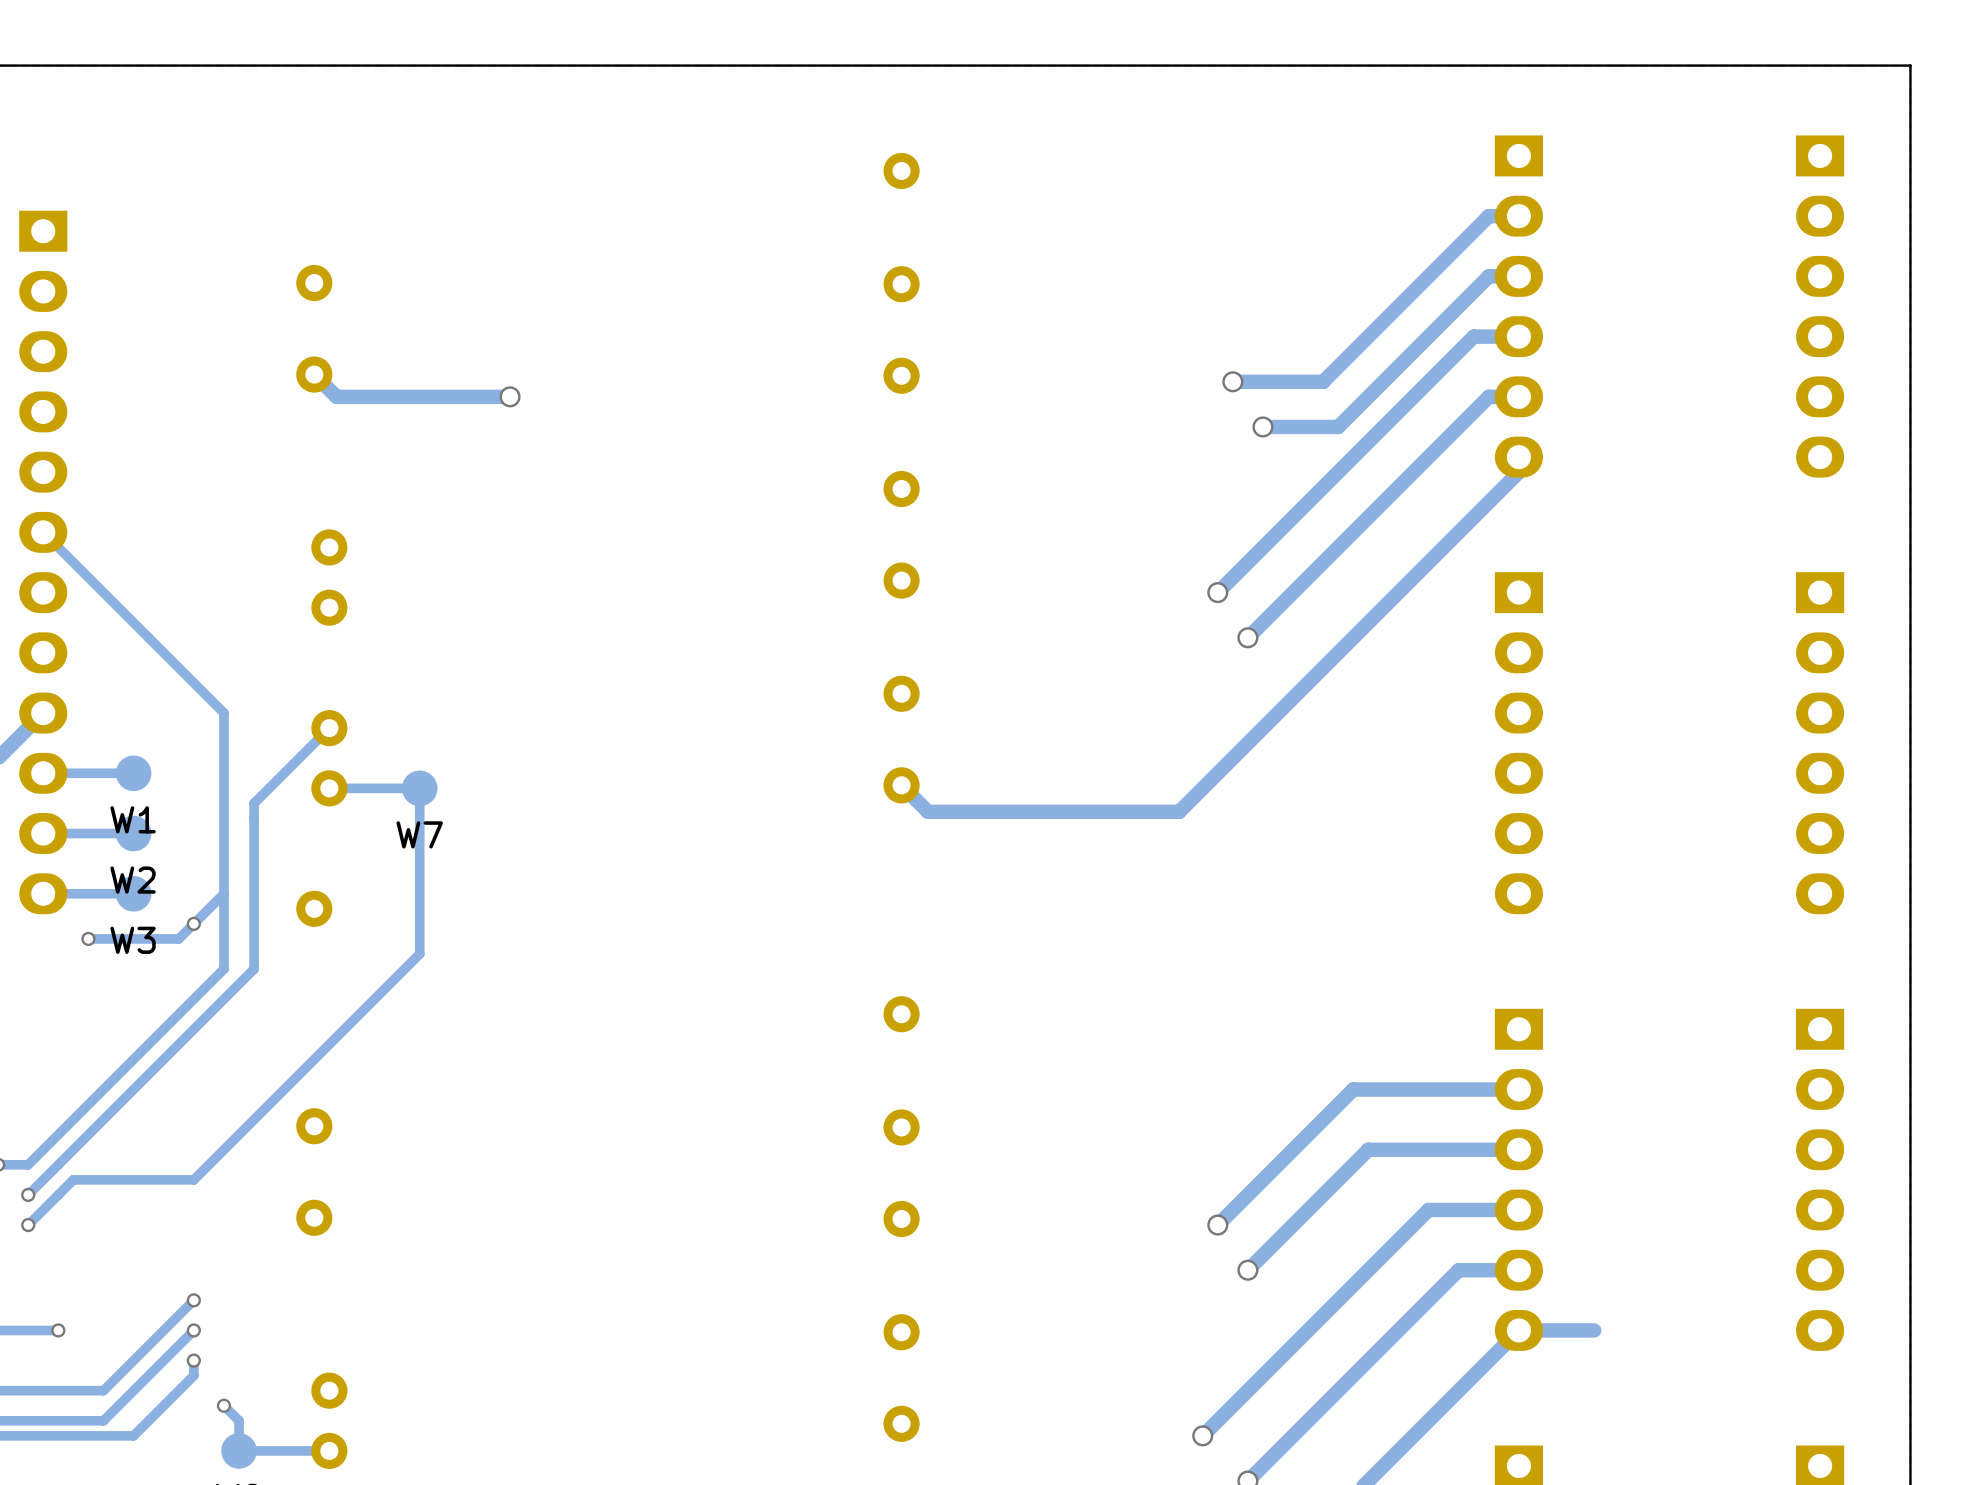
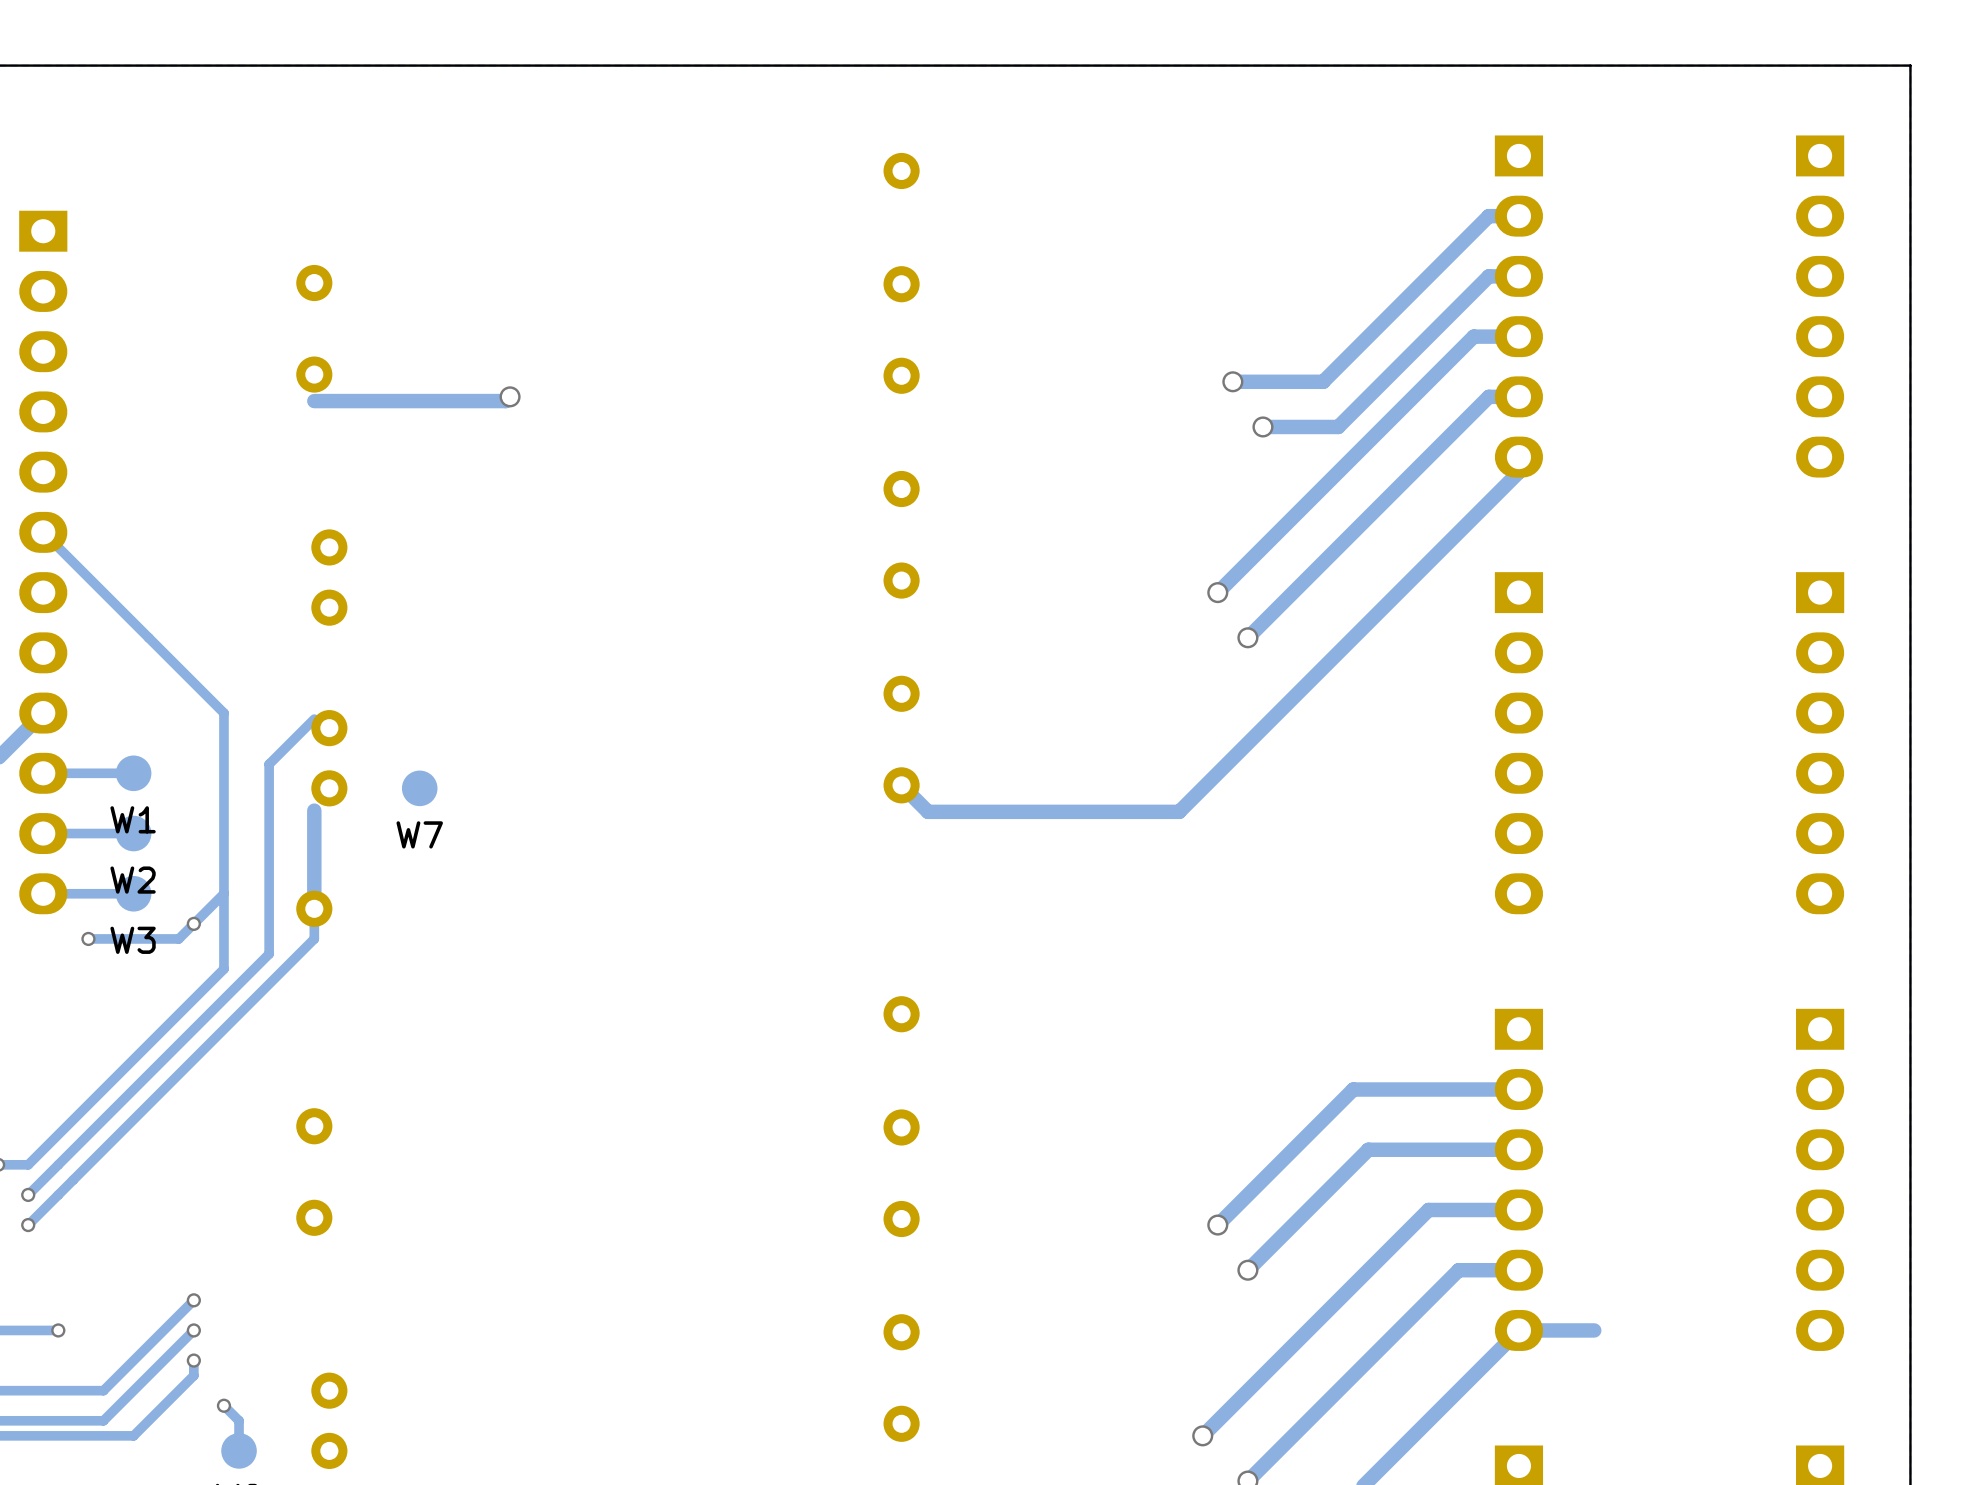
track: (314, 374) (336, 396) (510, 396) -> (314, 401) (505, 401) (510, 396)
track: (329, 728) (254, 803) (254, 969) -> (314, 719) (269, 764) (269, 954) (254, 969)
track: (329, 788) (419, 788) (419, 954) (193, 1179) (73, 1179) -> (314, 810) (314, 938) (73, 1179)
track: (329, 1450) (239, 1450) -> none

